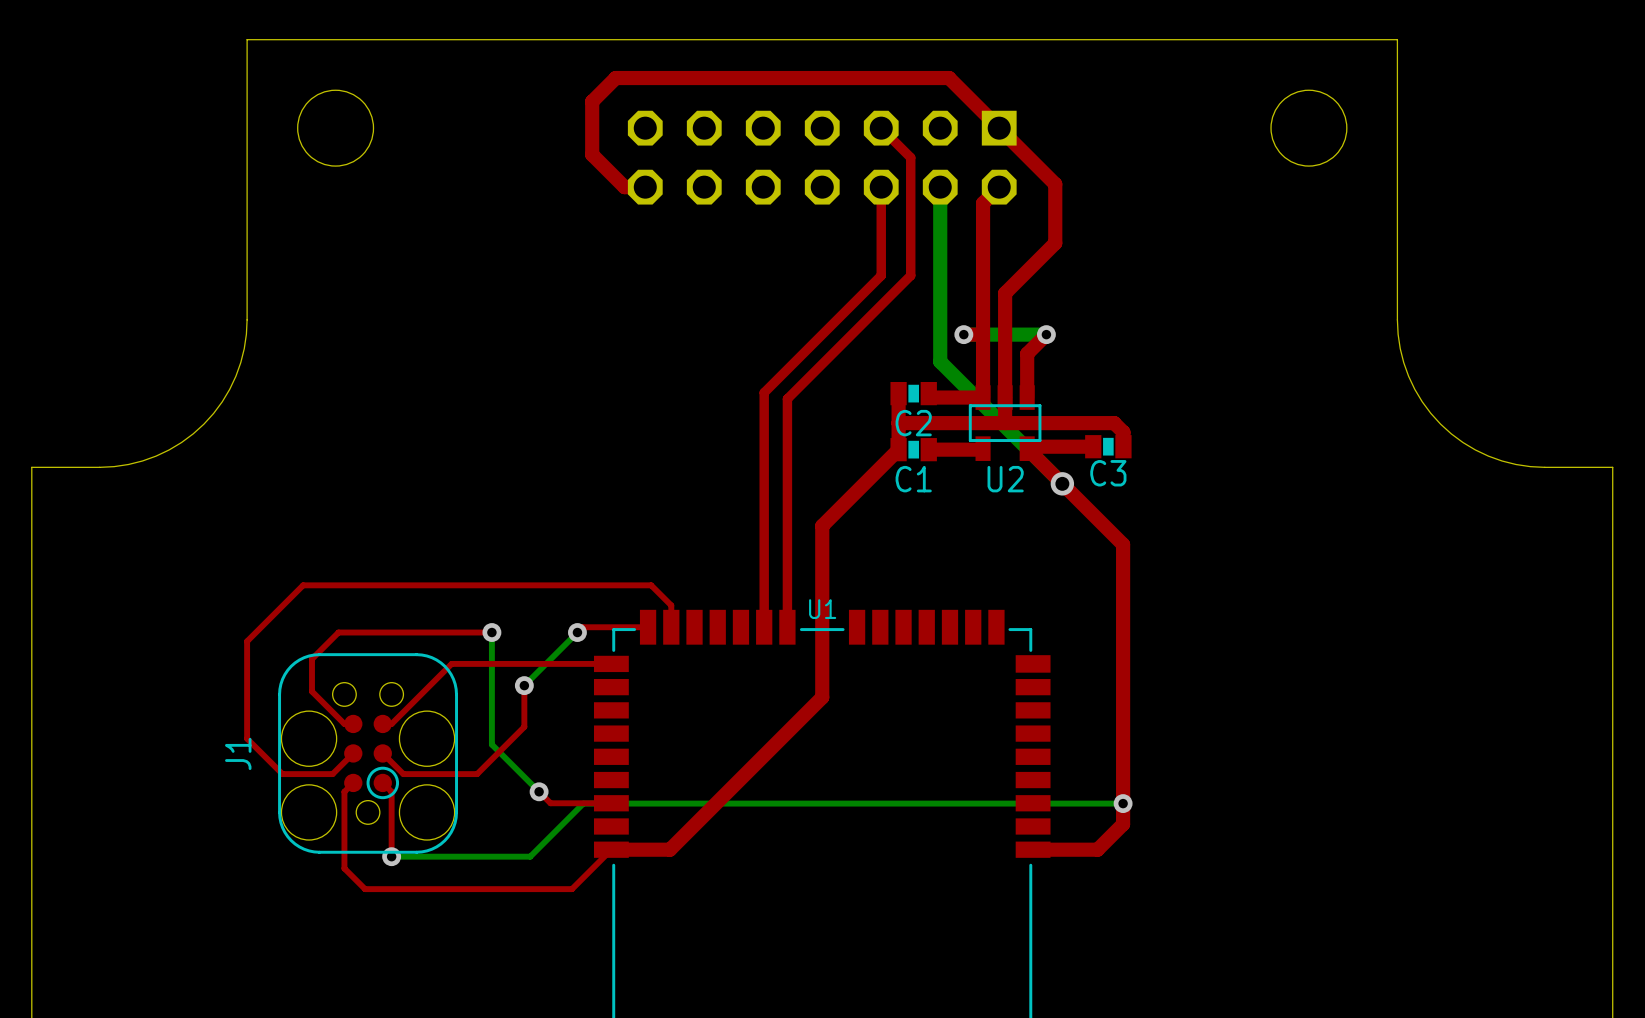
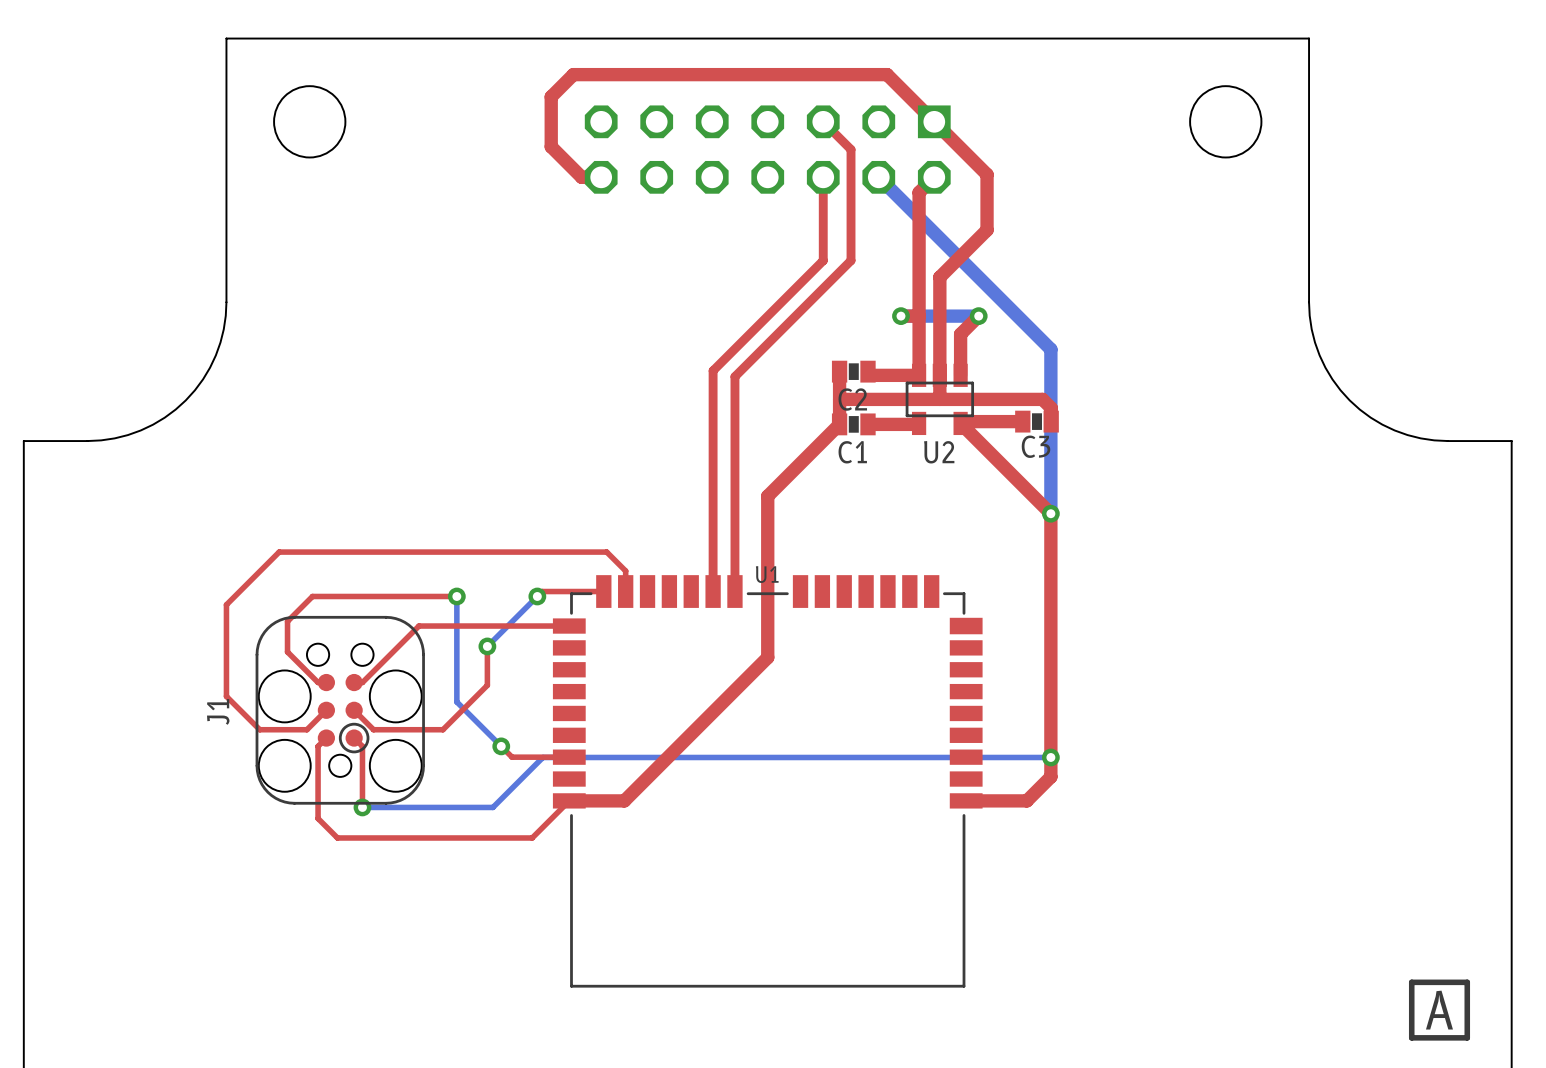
bottom track: (940, 187) (940, 361) (1062, 483) -> (878, 177) (1050, 349) (1050, 513)
via: (1062, 483) -> none
via: none -> (1050, 513)

